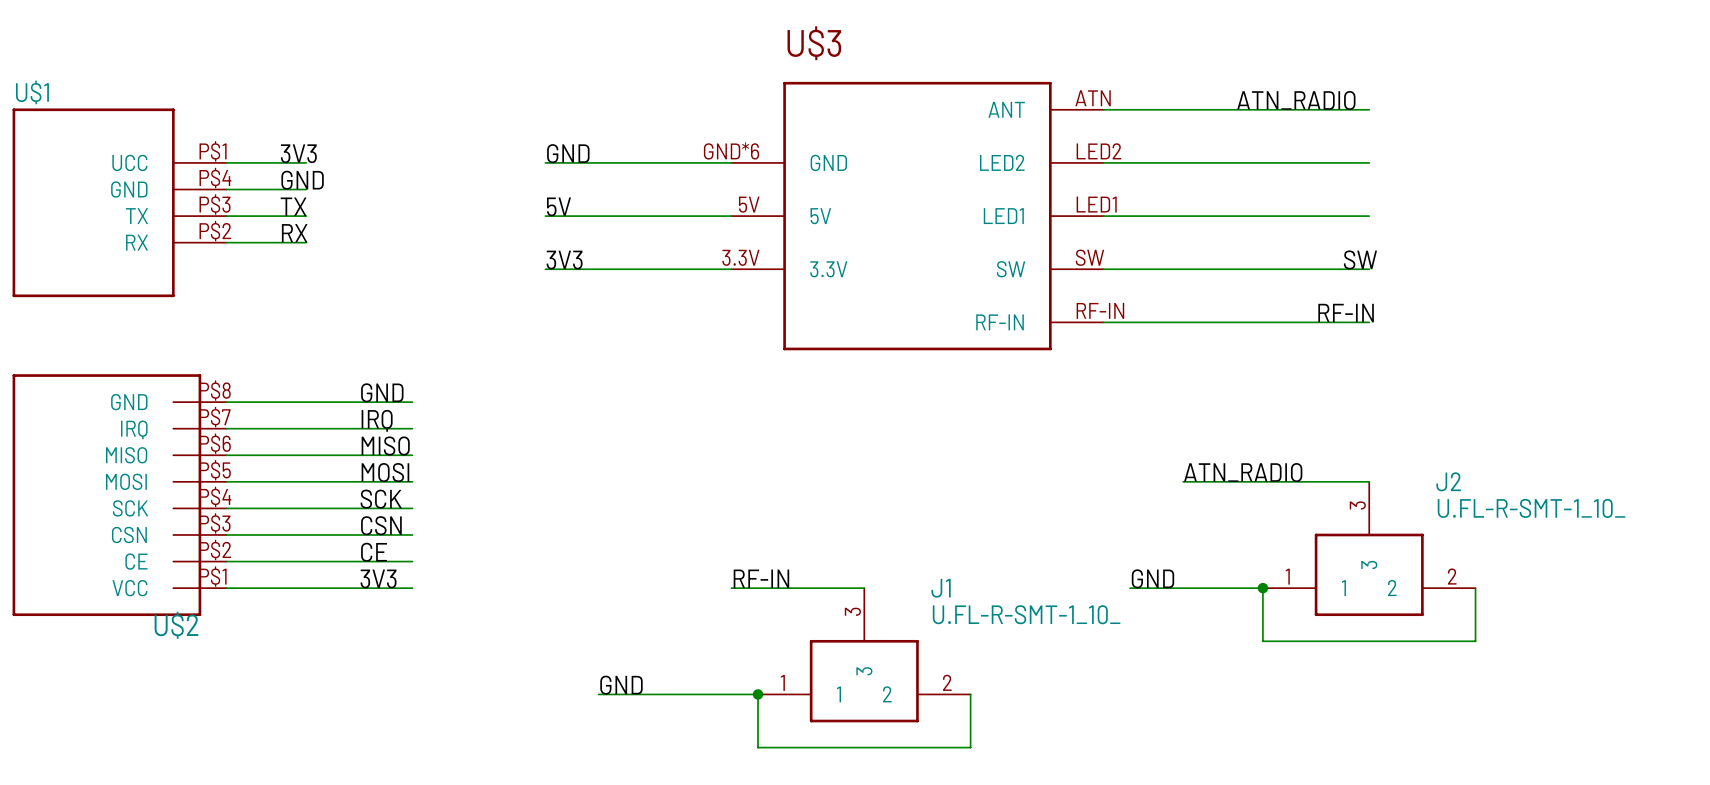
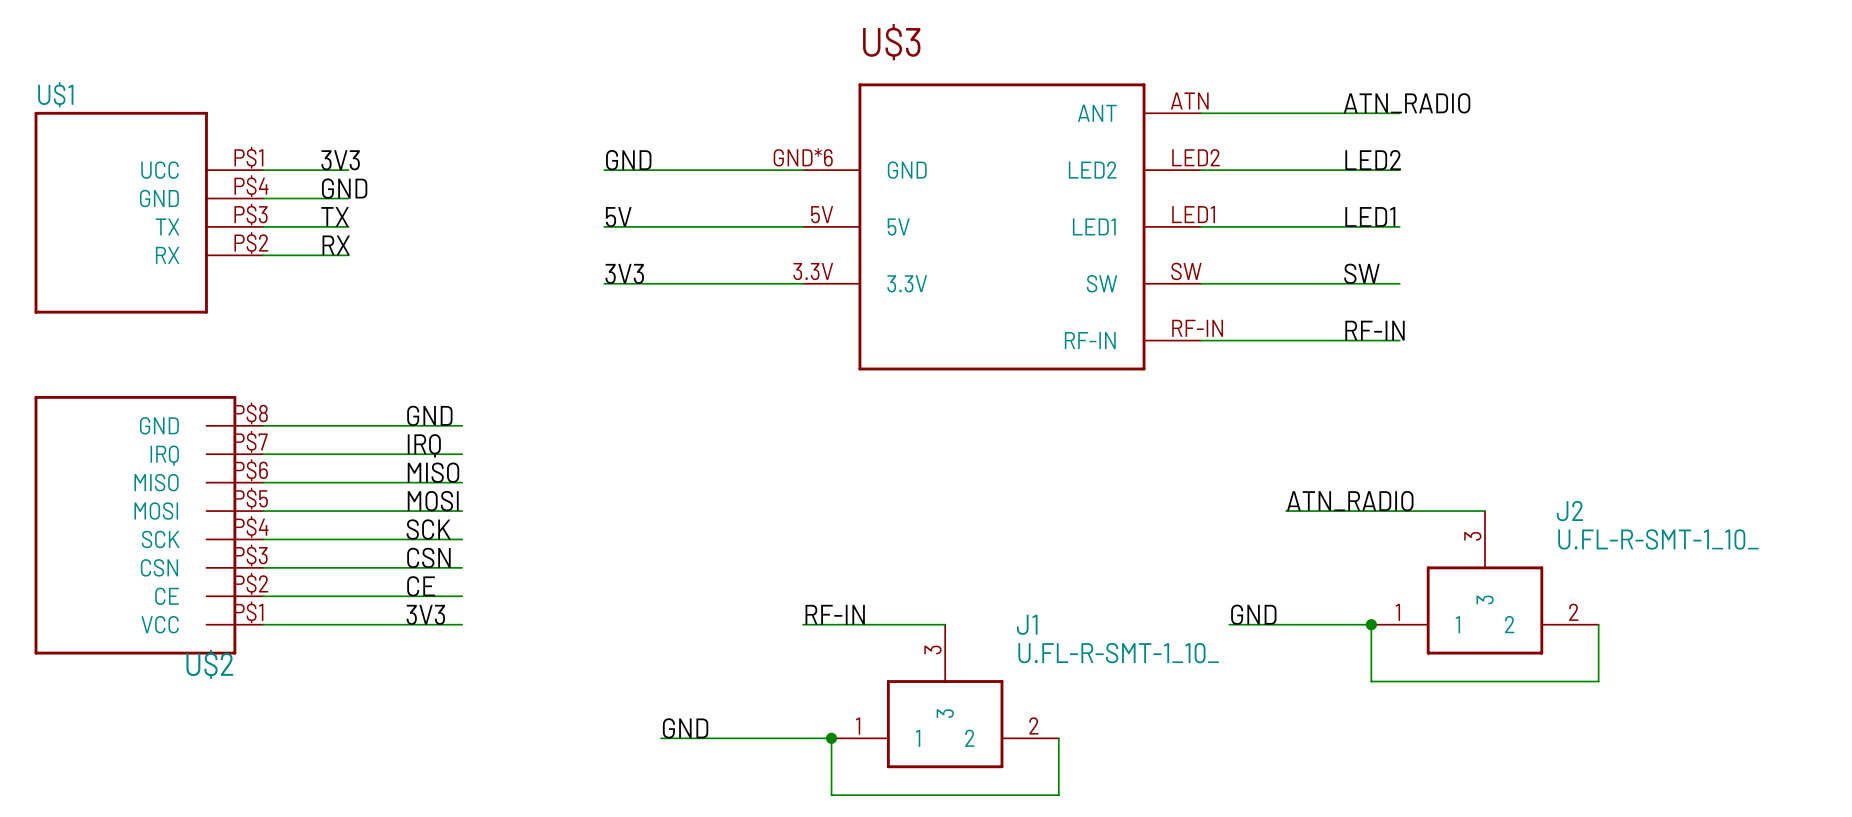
wire: (1289, 109) (1369, 109) -> none
label: none -> LED2 (1373, 160)
wire: (1289, 162) (1369, 162) -> none
label: none -> LED1 (1370, 216)
wire: (1289, 216) (1369, 216) -> none
label position: SW (1360, 259) -> SW (1361, 273)
wire: (1289, 269) (1369, 269) -> none
label position: RF-IN (1346, 313) -> RF-IN (1375, 330)
wire: (1289, 322) (1369, 322) -> none

